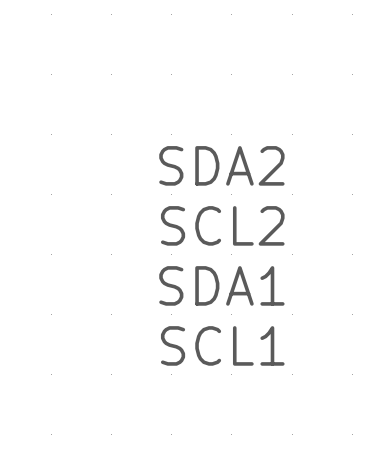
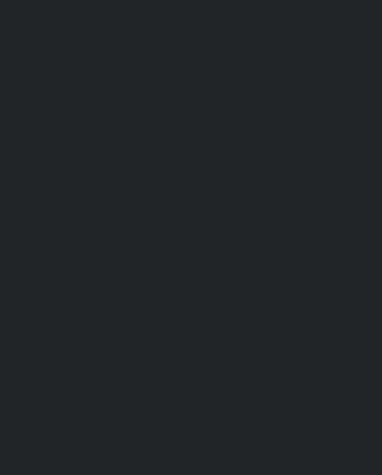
text: SDA2 (221, 165) -> none
text: SCL2 (222, 225) -> none
text: SDA1 (221, 285) -> none
text: SCL1 (222, 345) -> none

